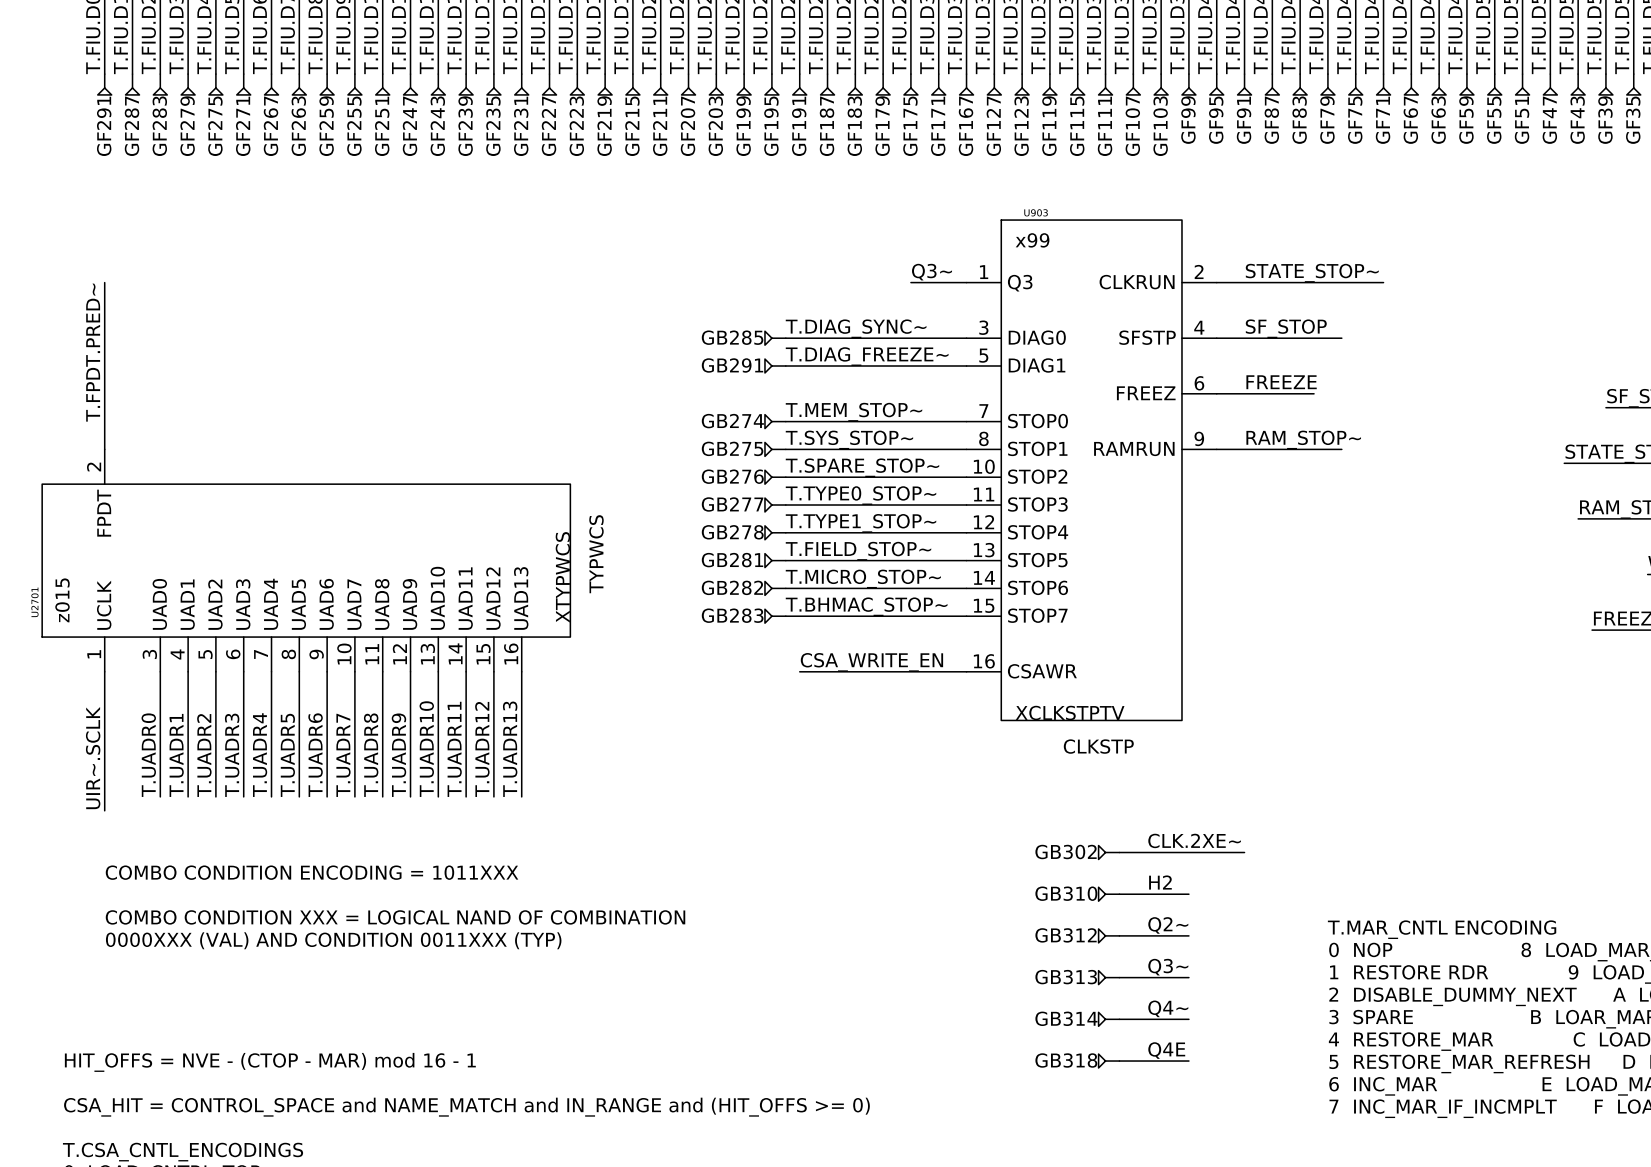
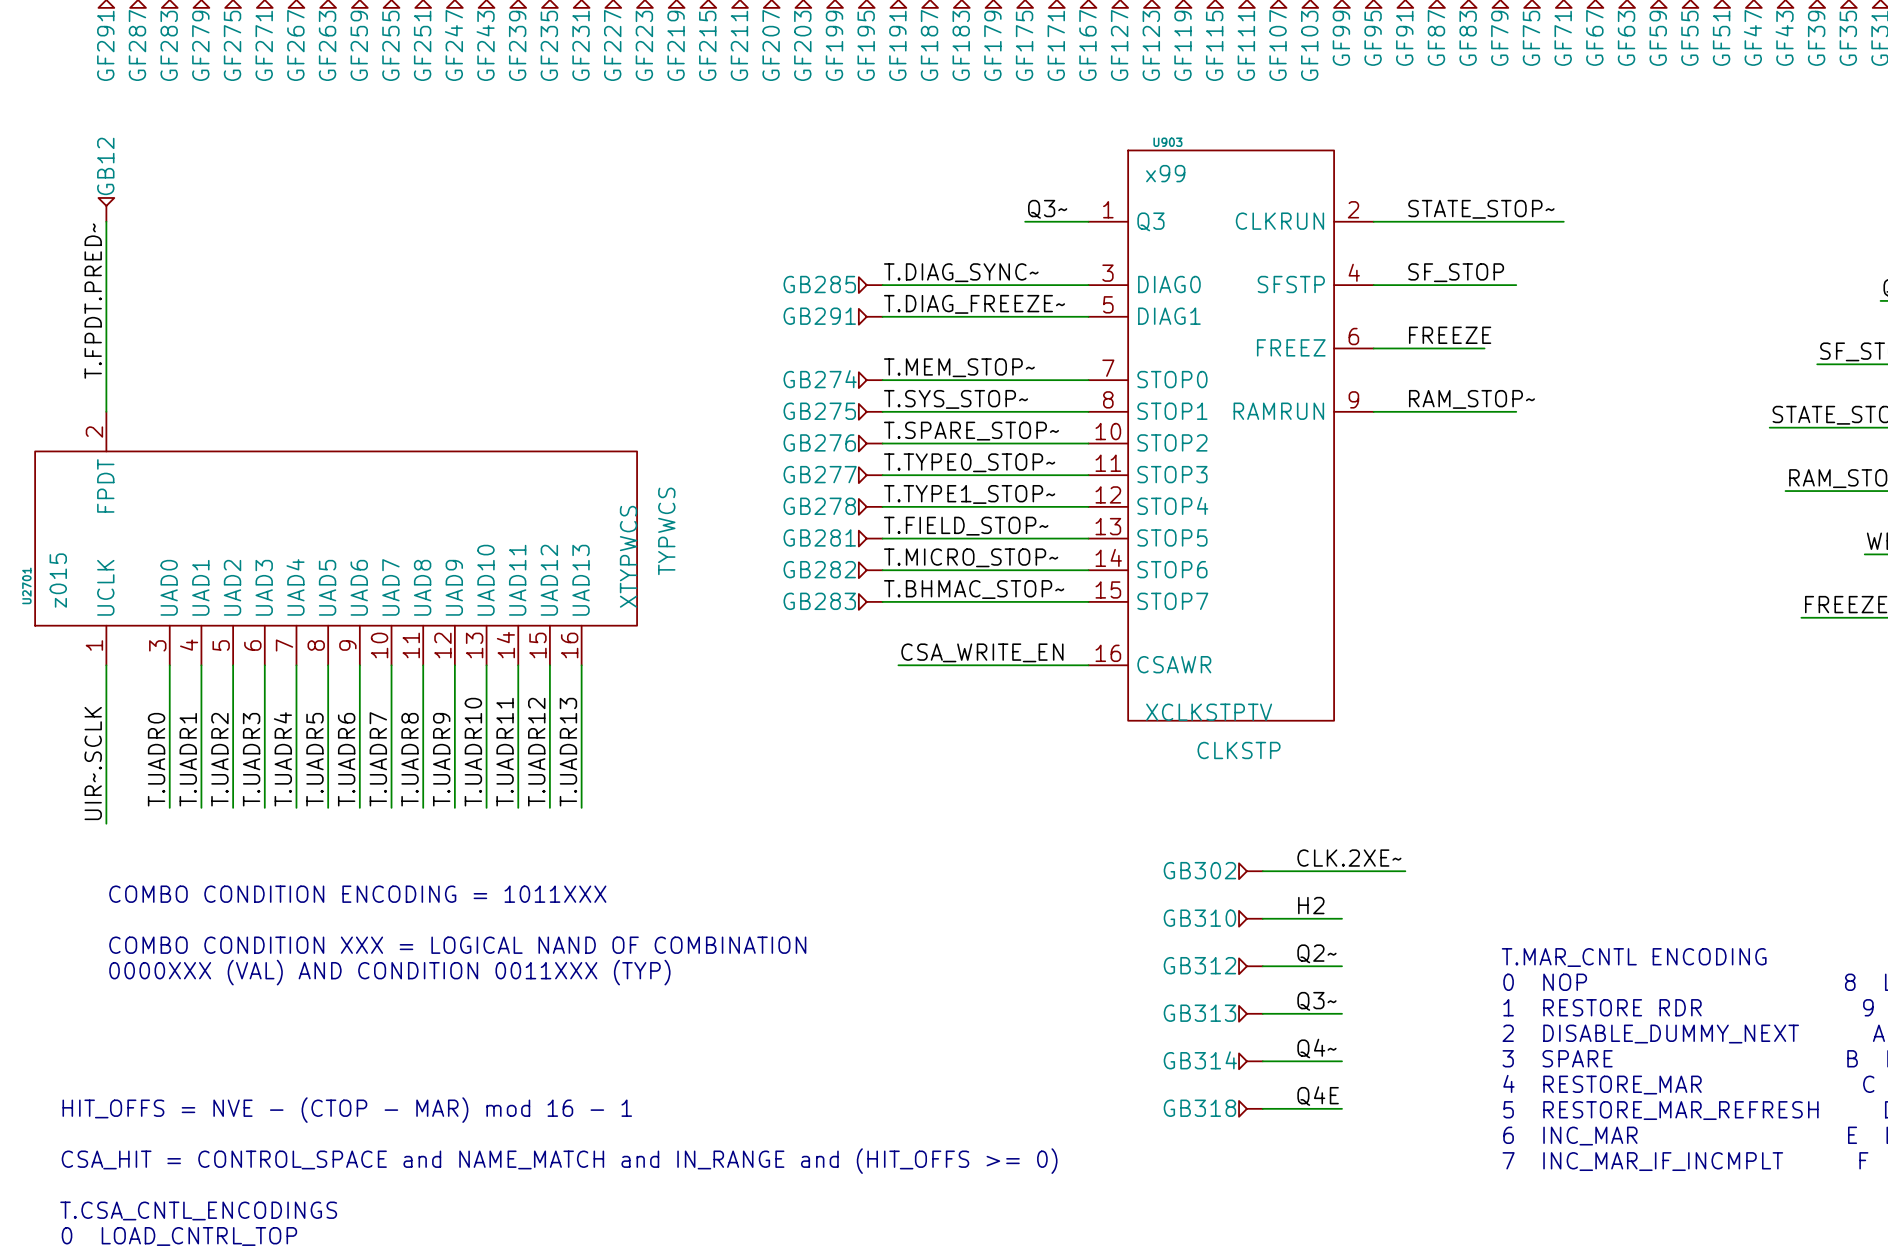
GB12: none -> (106, 209)

